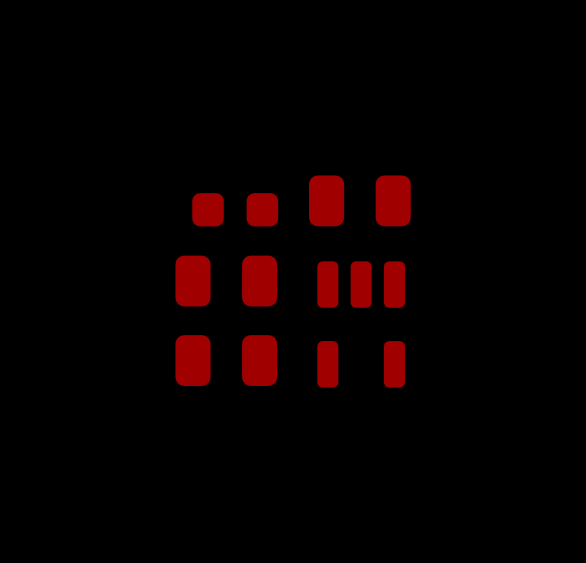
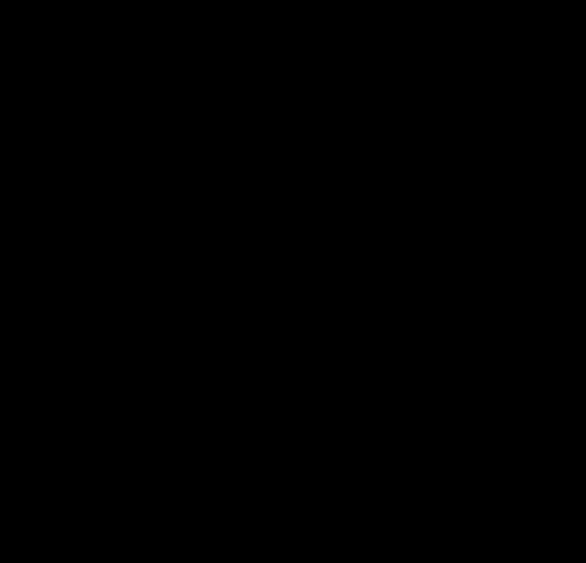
part: (359, 200) -> none
part: (235, 209) -> none
part: (226, 281) -> none
part: (361, 324) -> none
part: (226, 360) -> none

